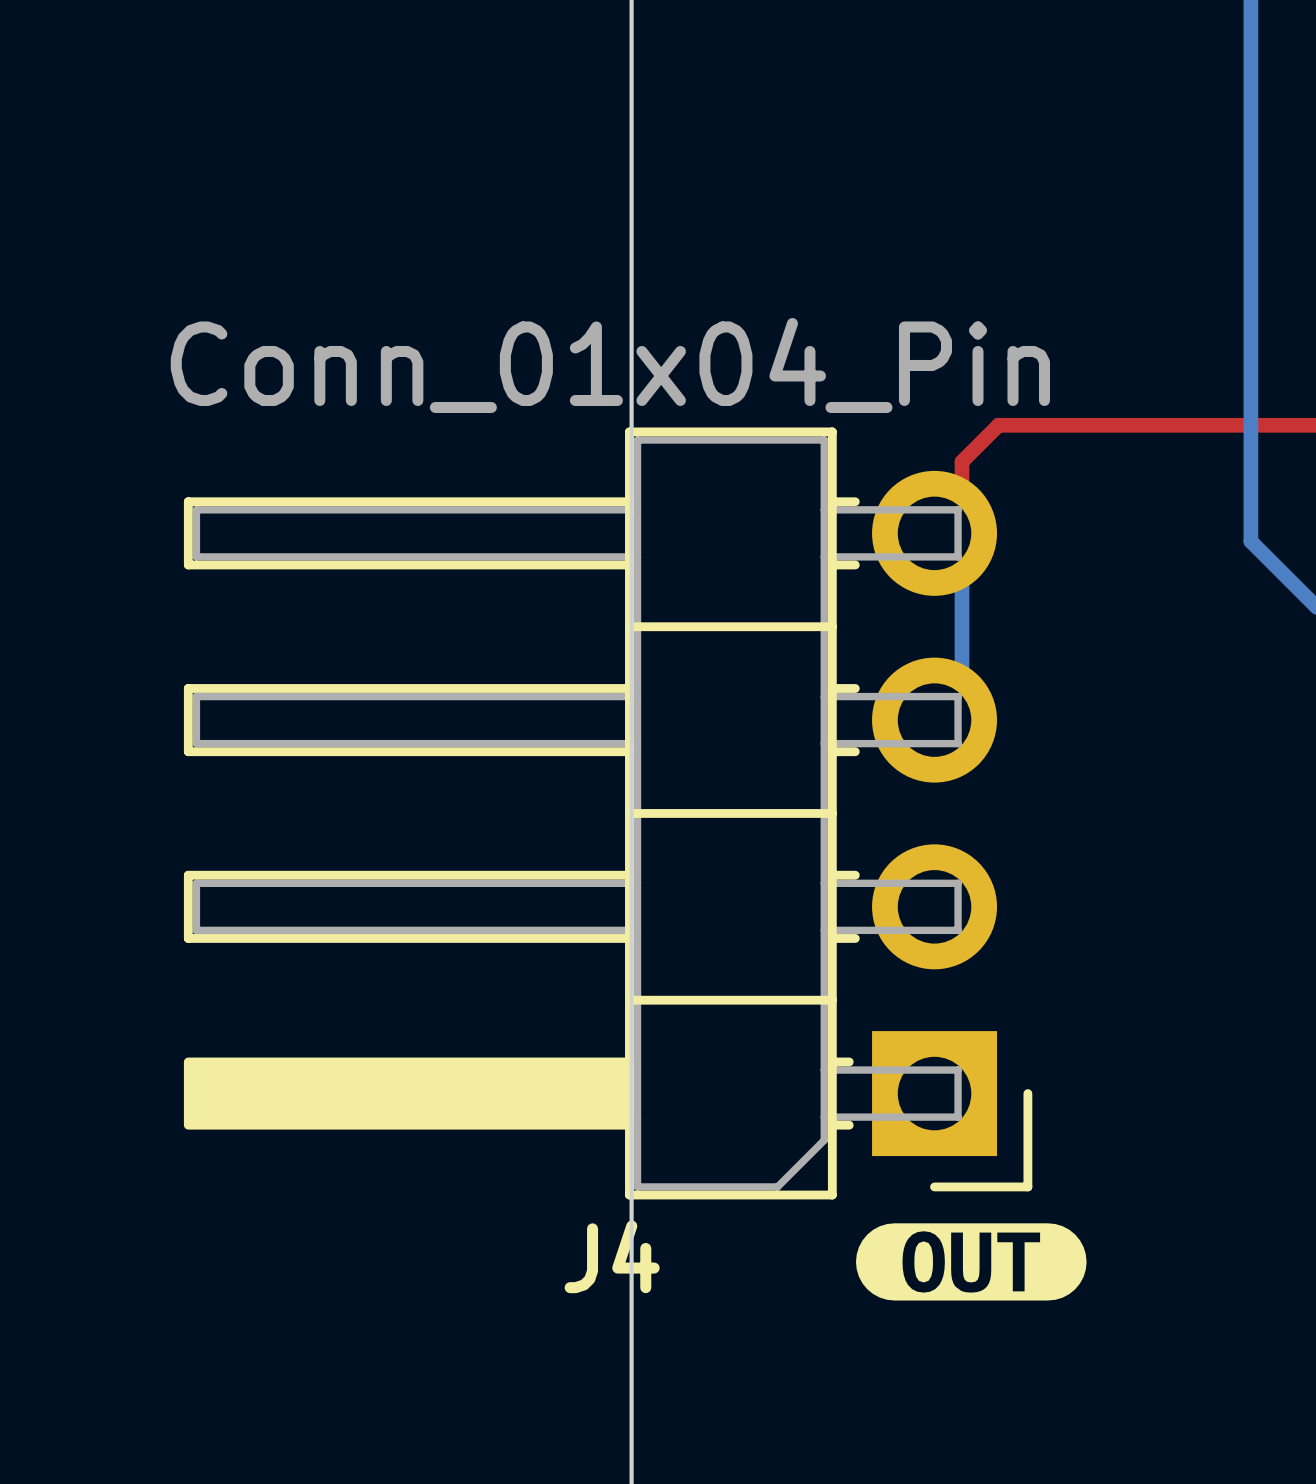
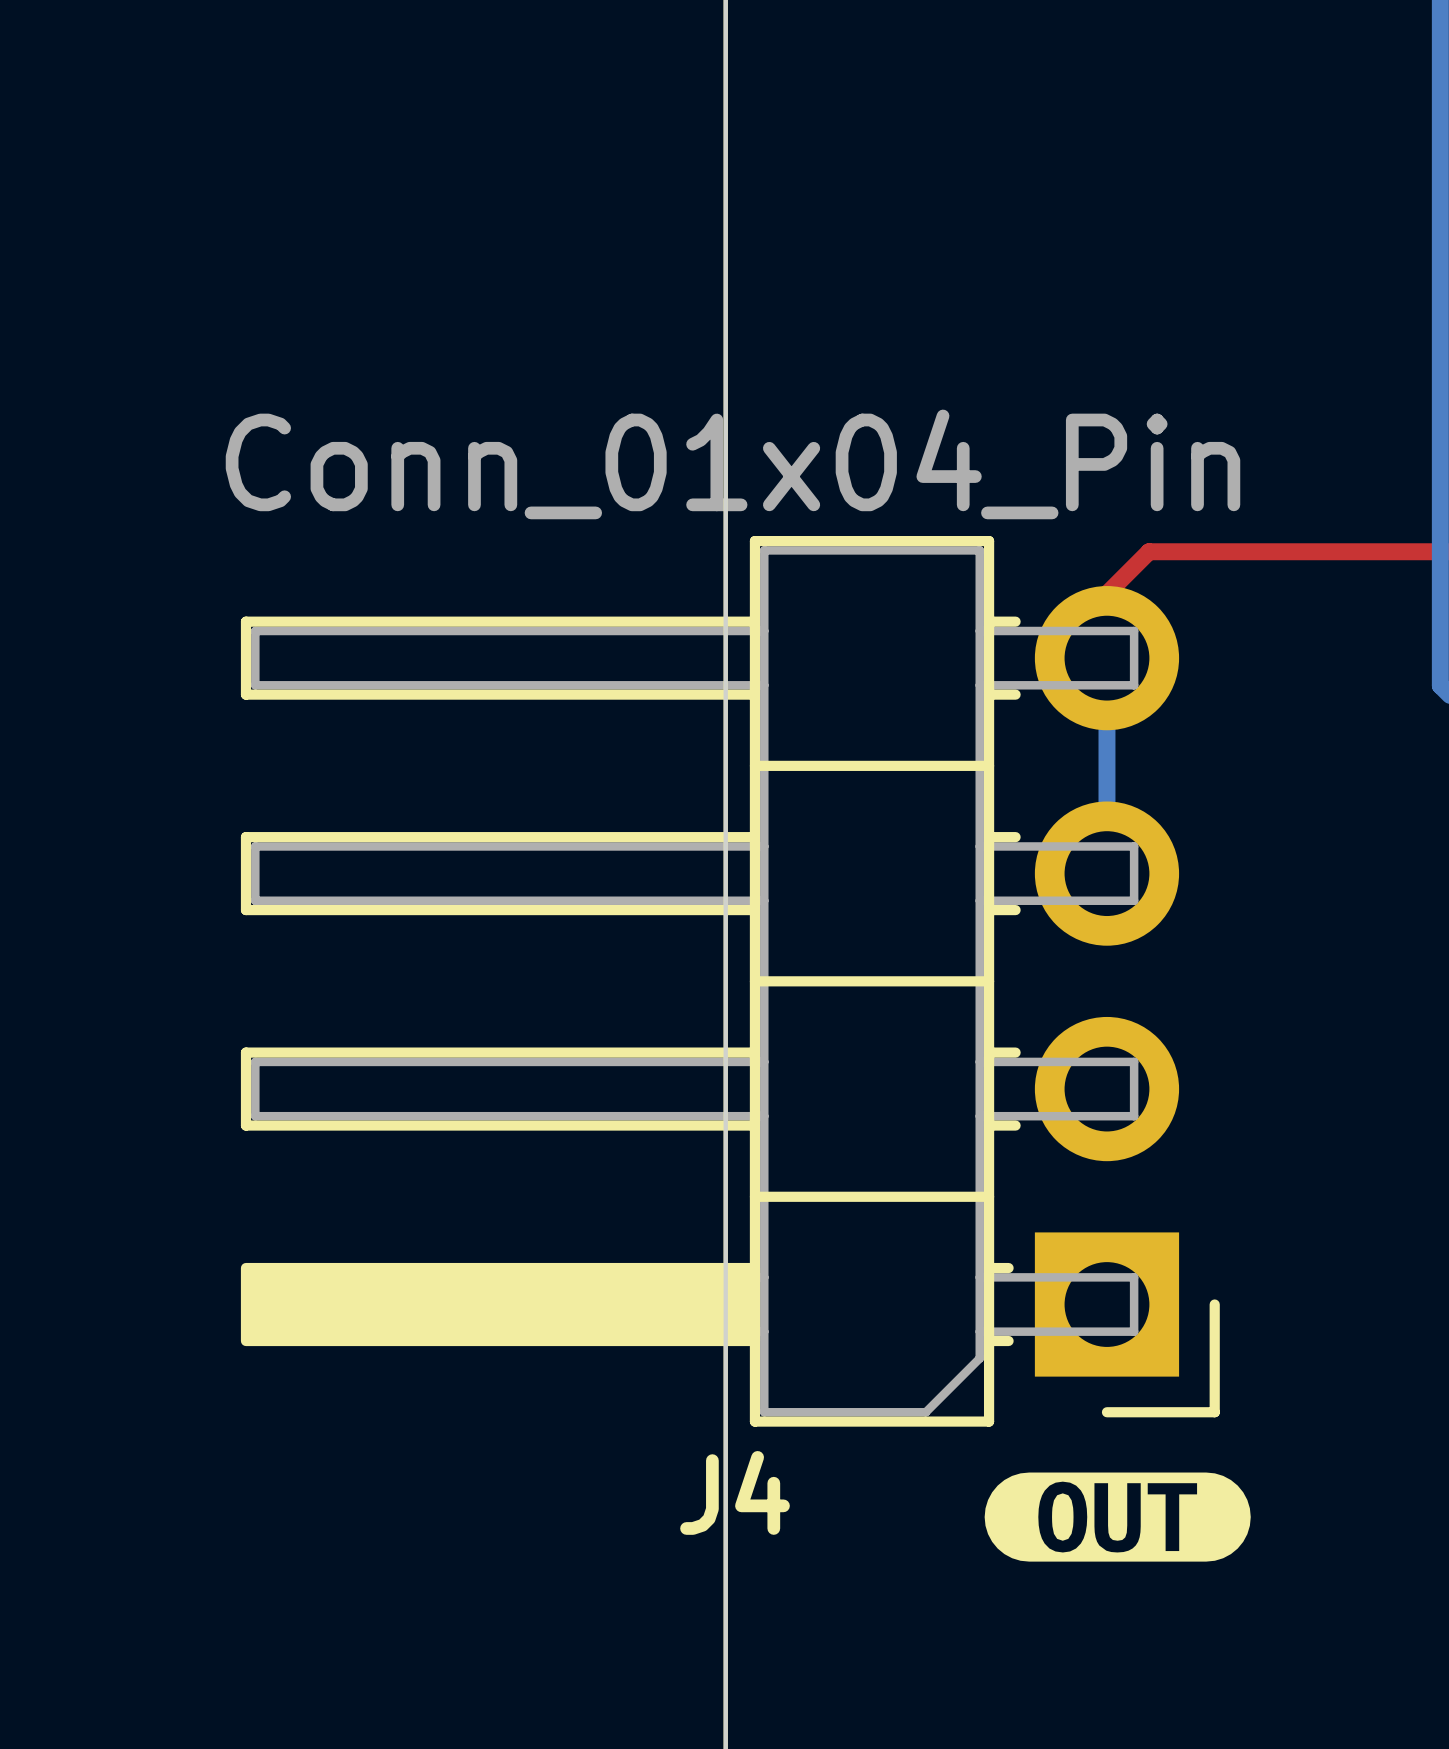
J4 position: (608, 813) -> (730, 981)

